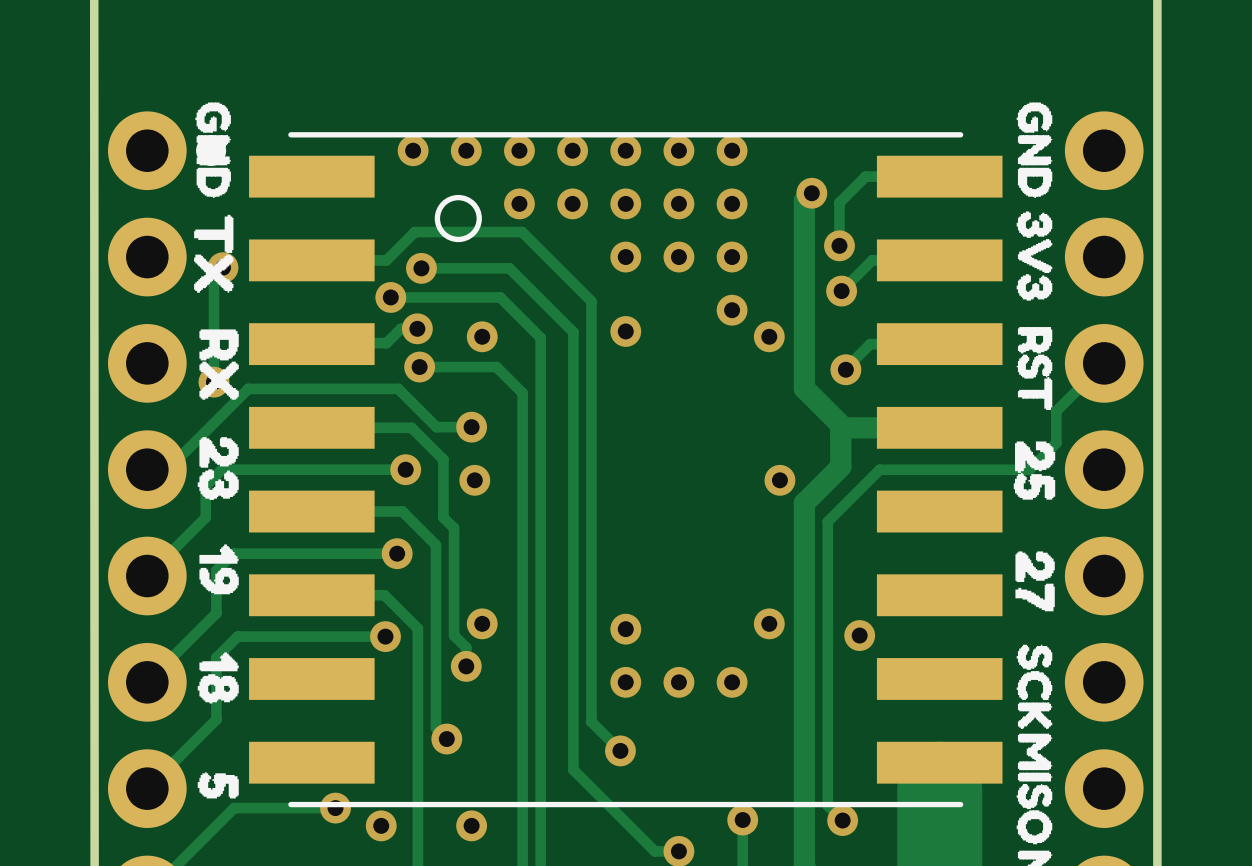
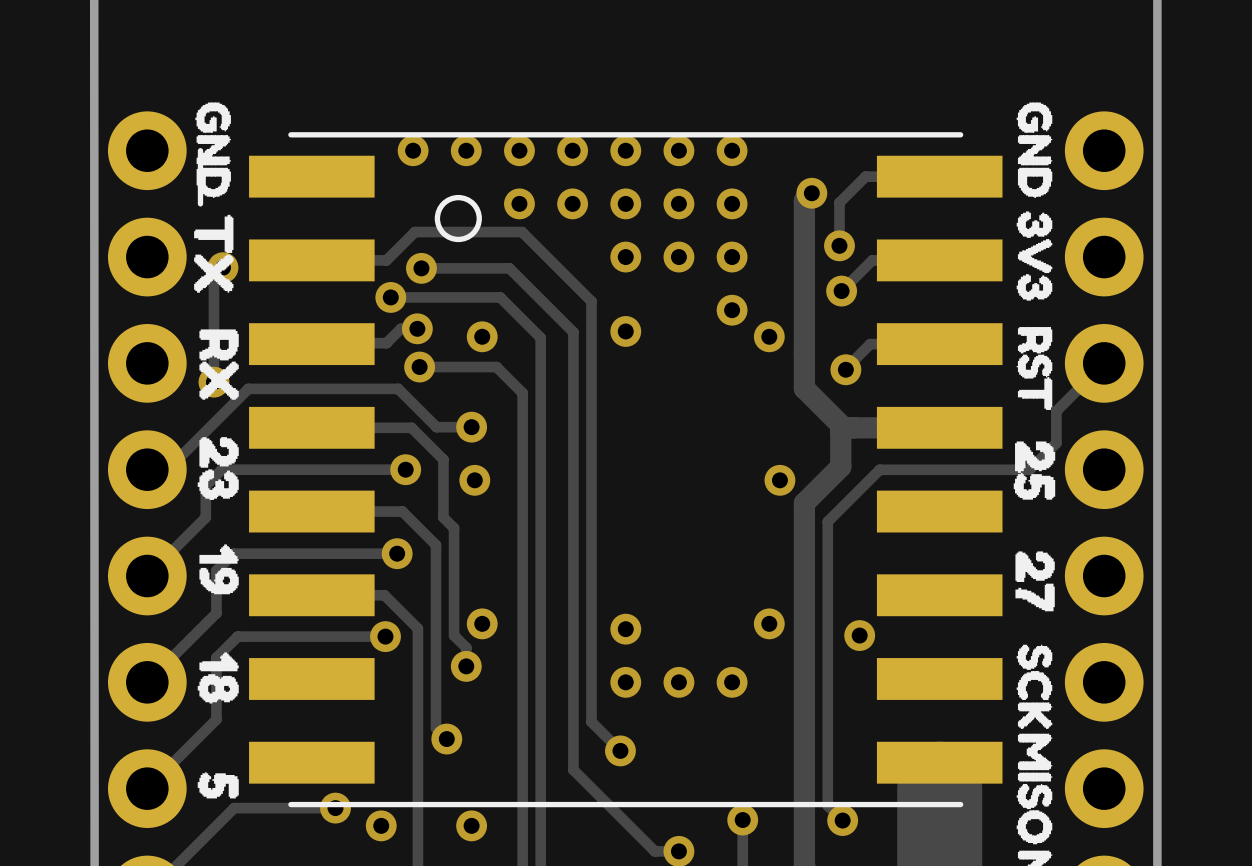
part footprint: [196, 132, 1003, 808] -> [197, 132, 1003, 808]

